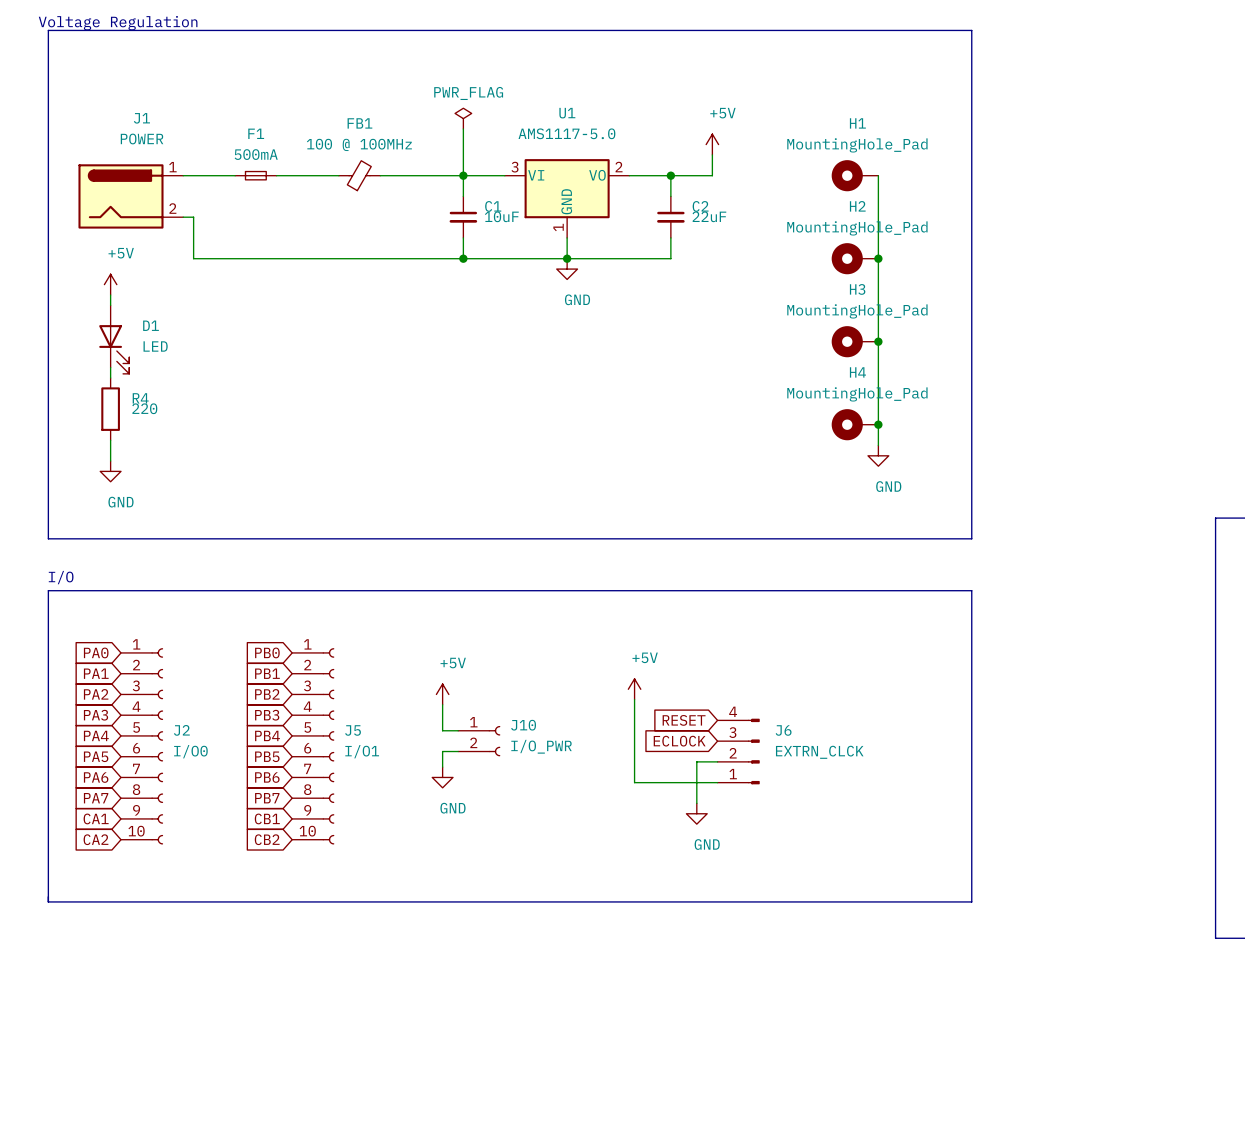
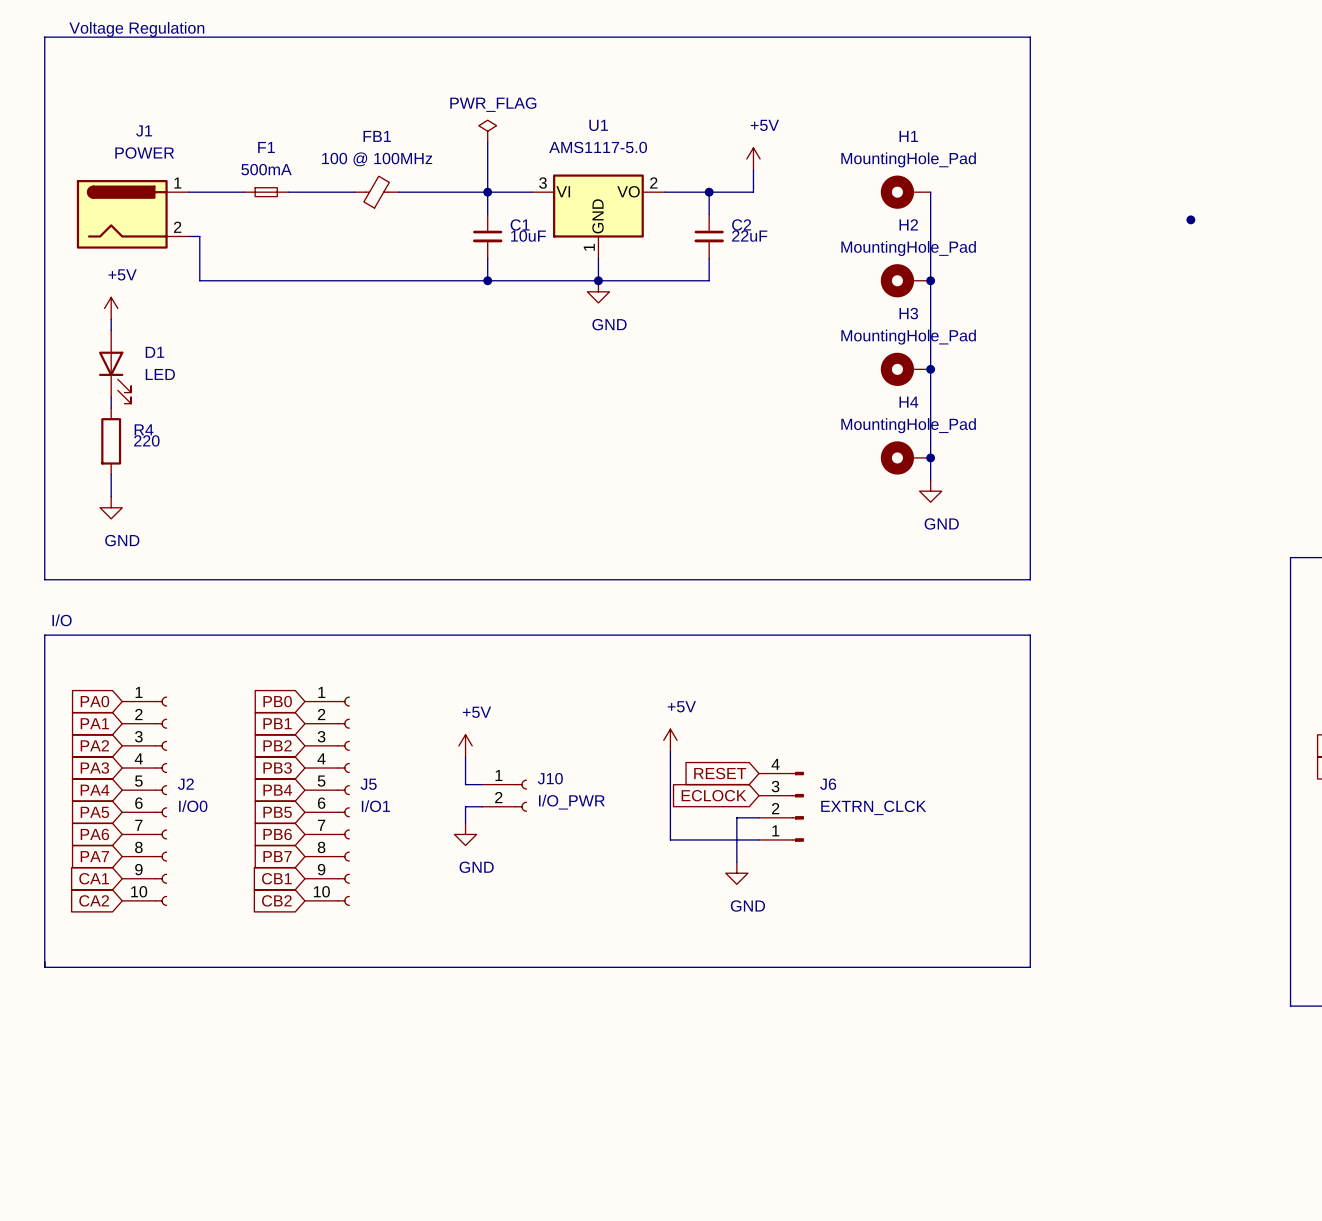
junction: none -> (1190, 219)

